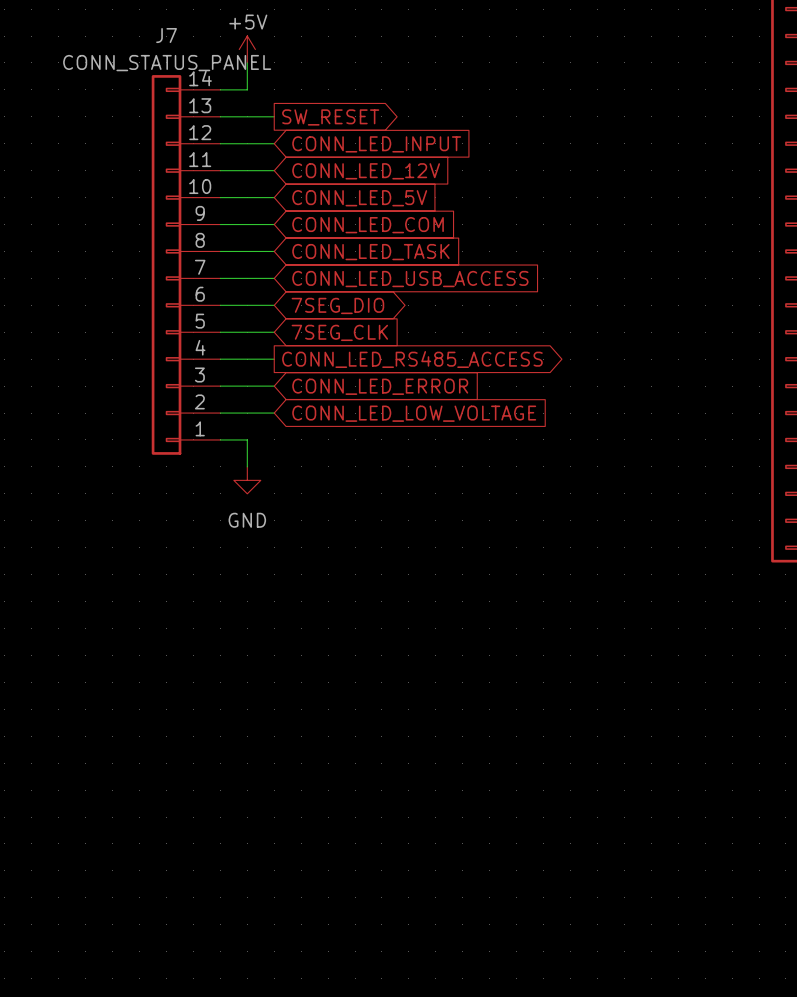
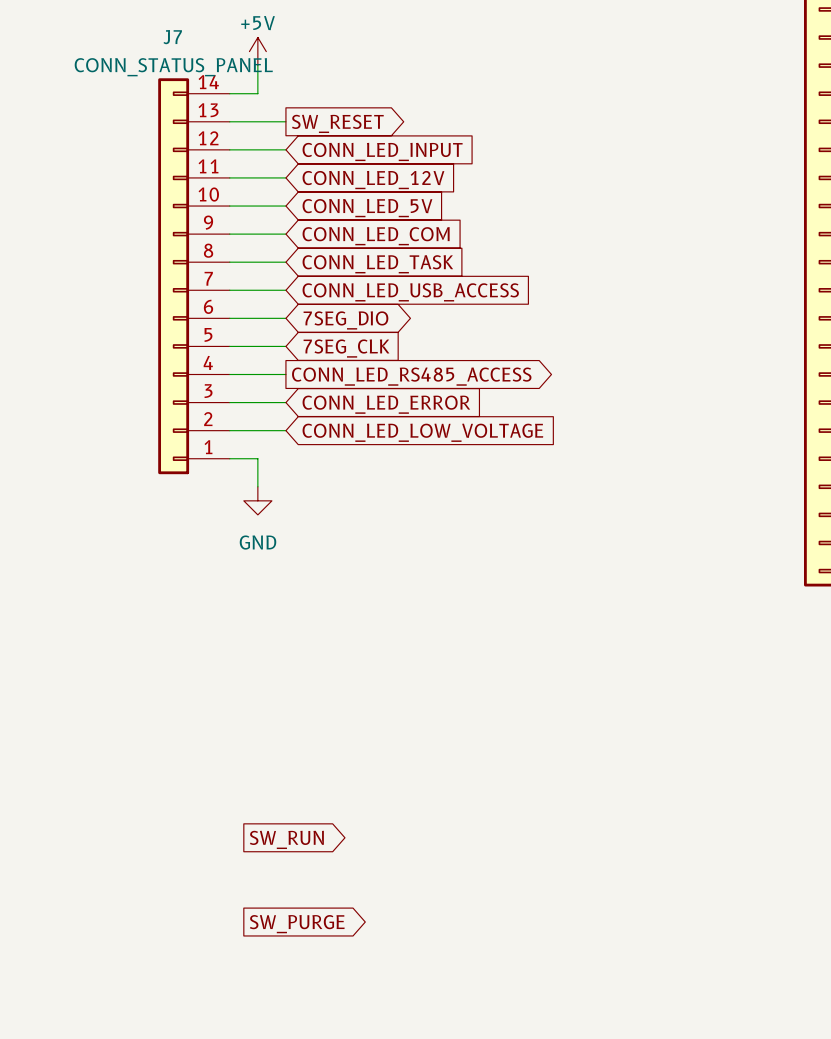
global label: none -> SW_RUN (286, 839)
global label: none -> SW_PURGE (297, 924)

